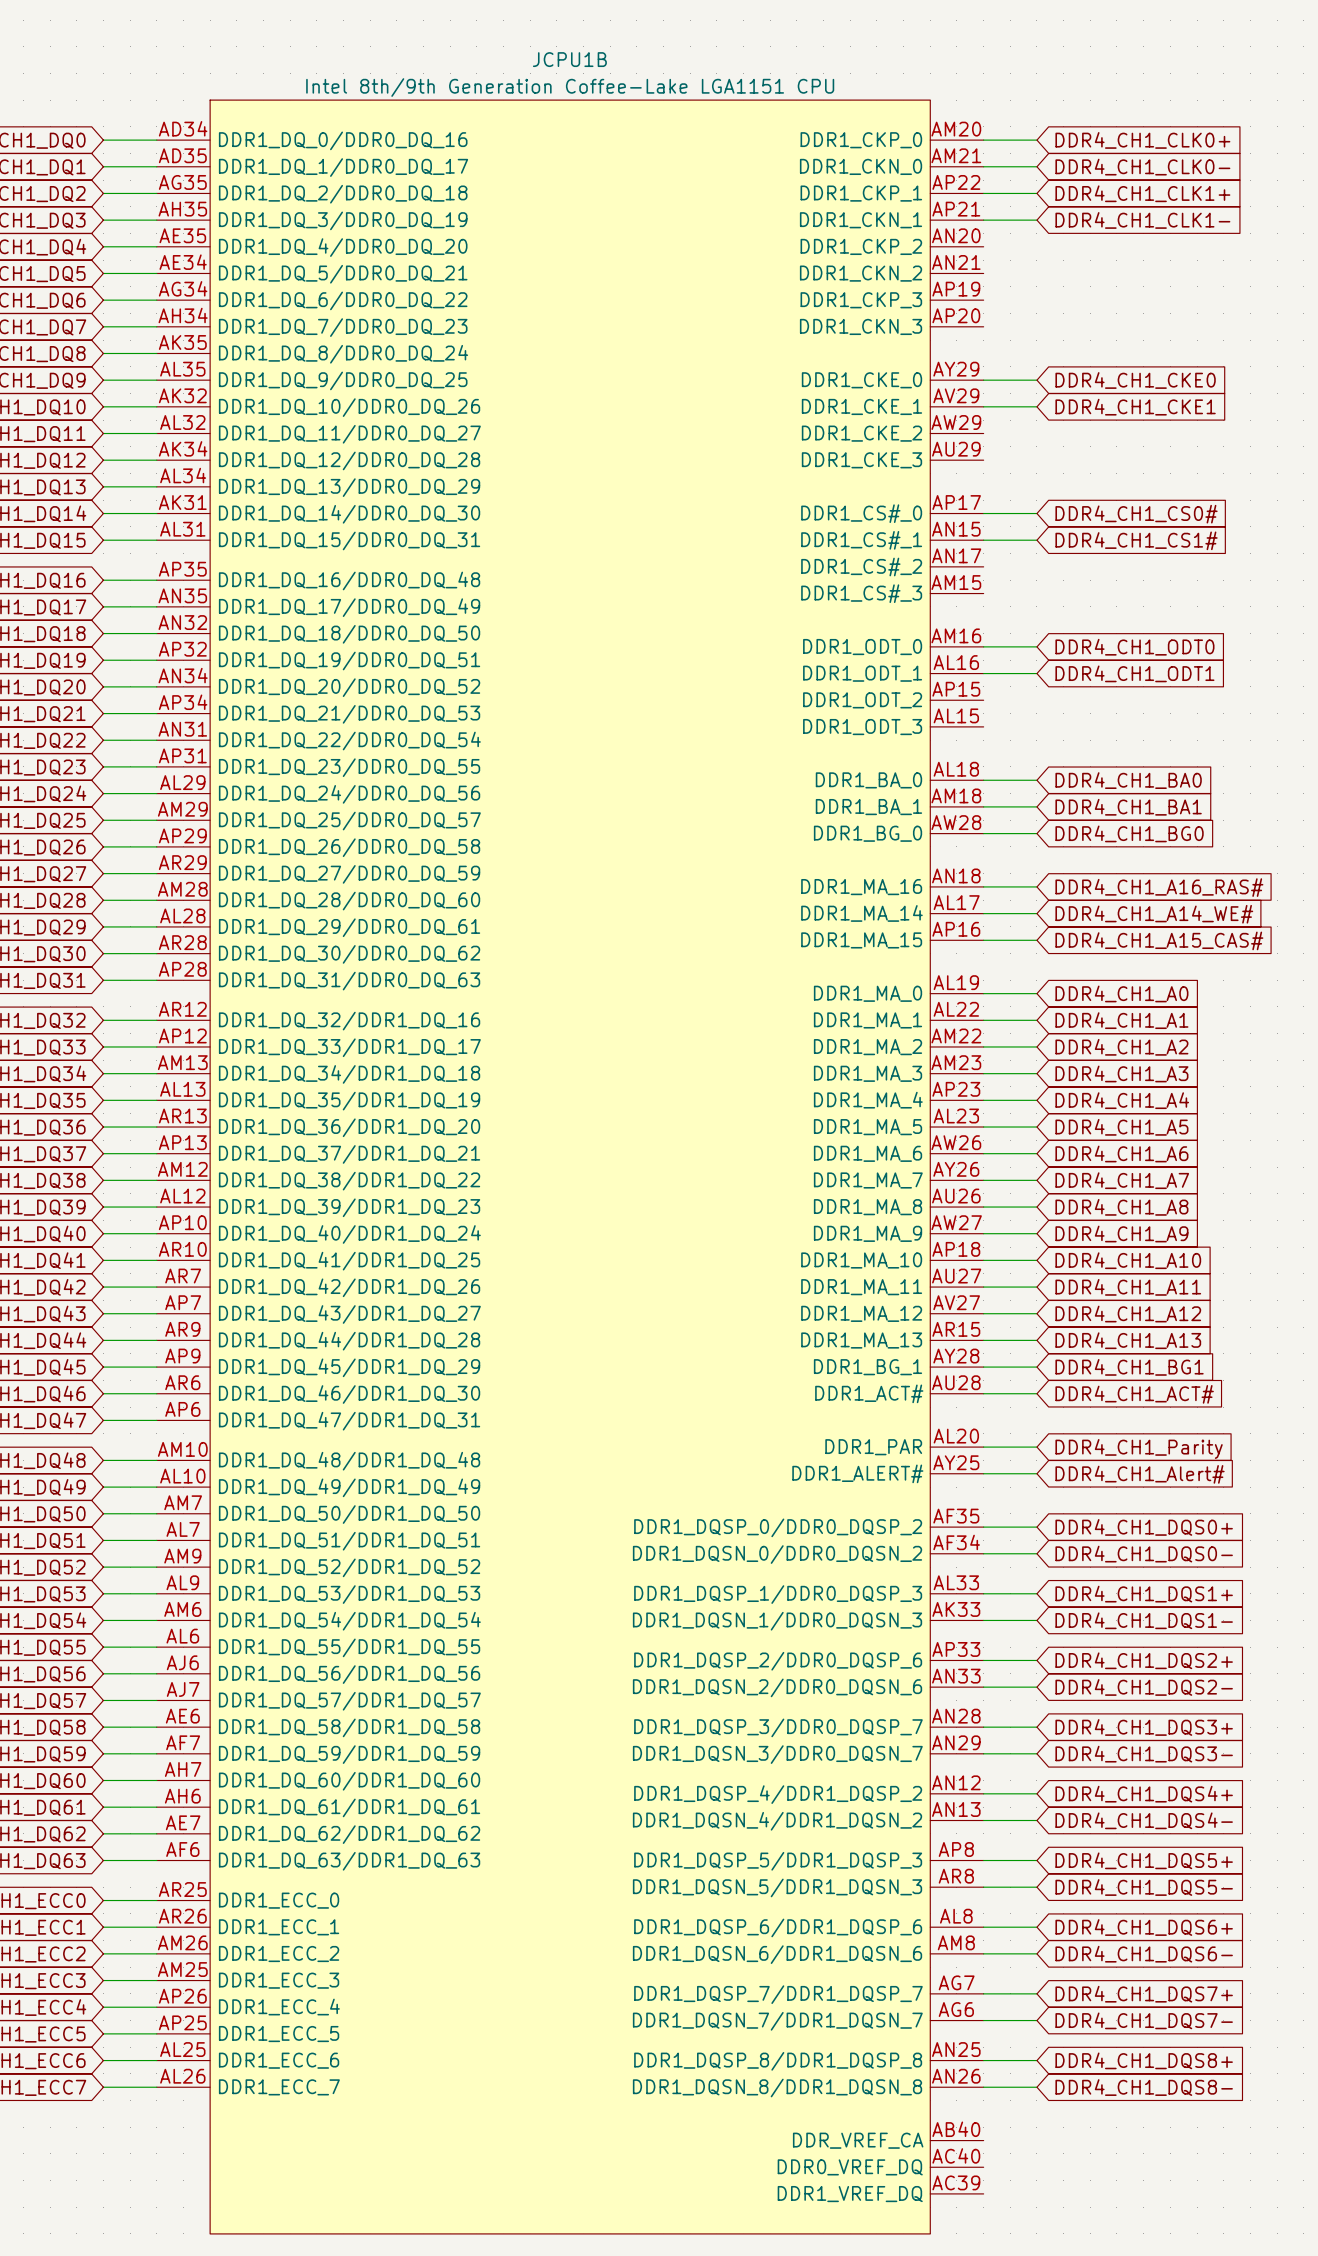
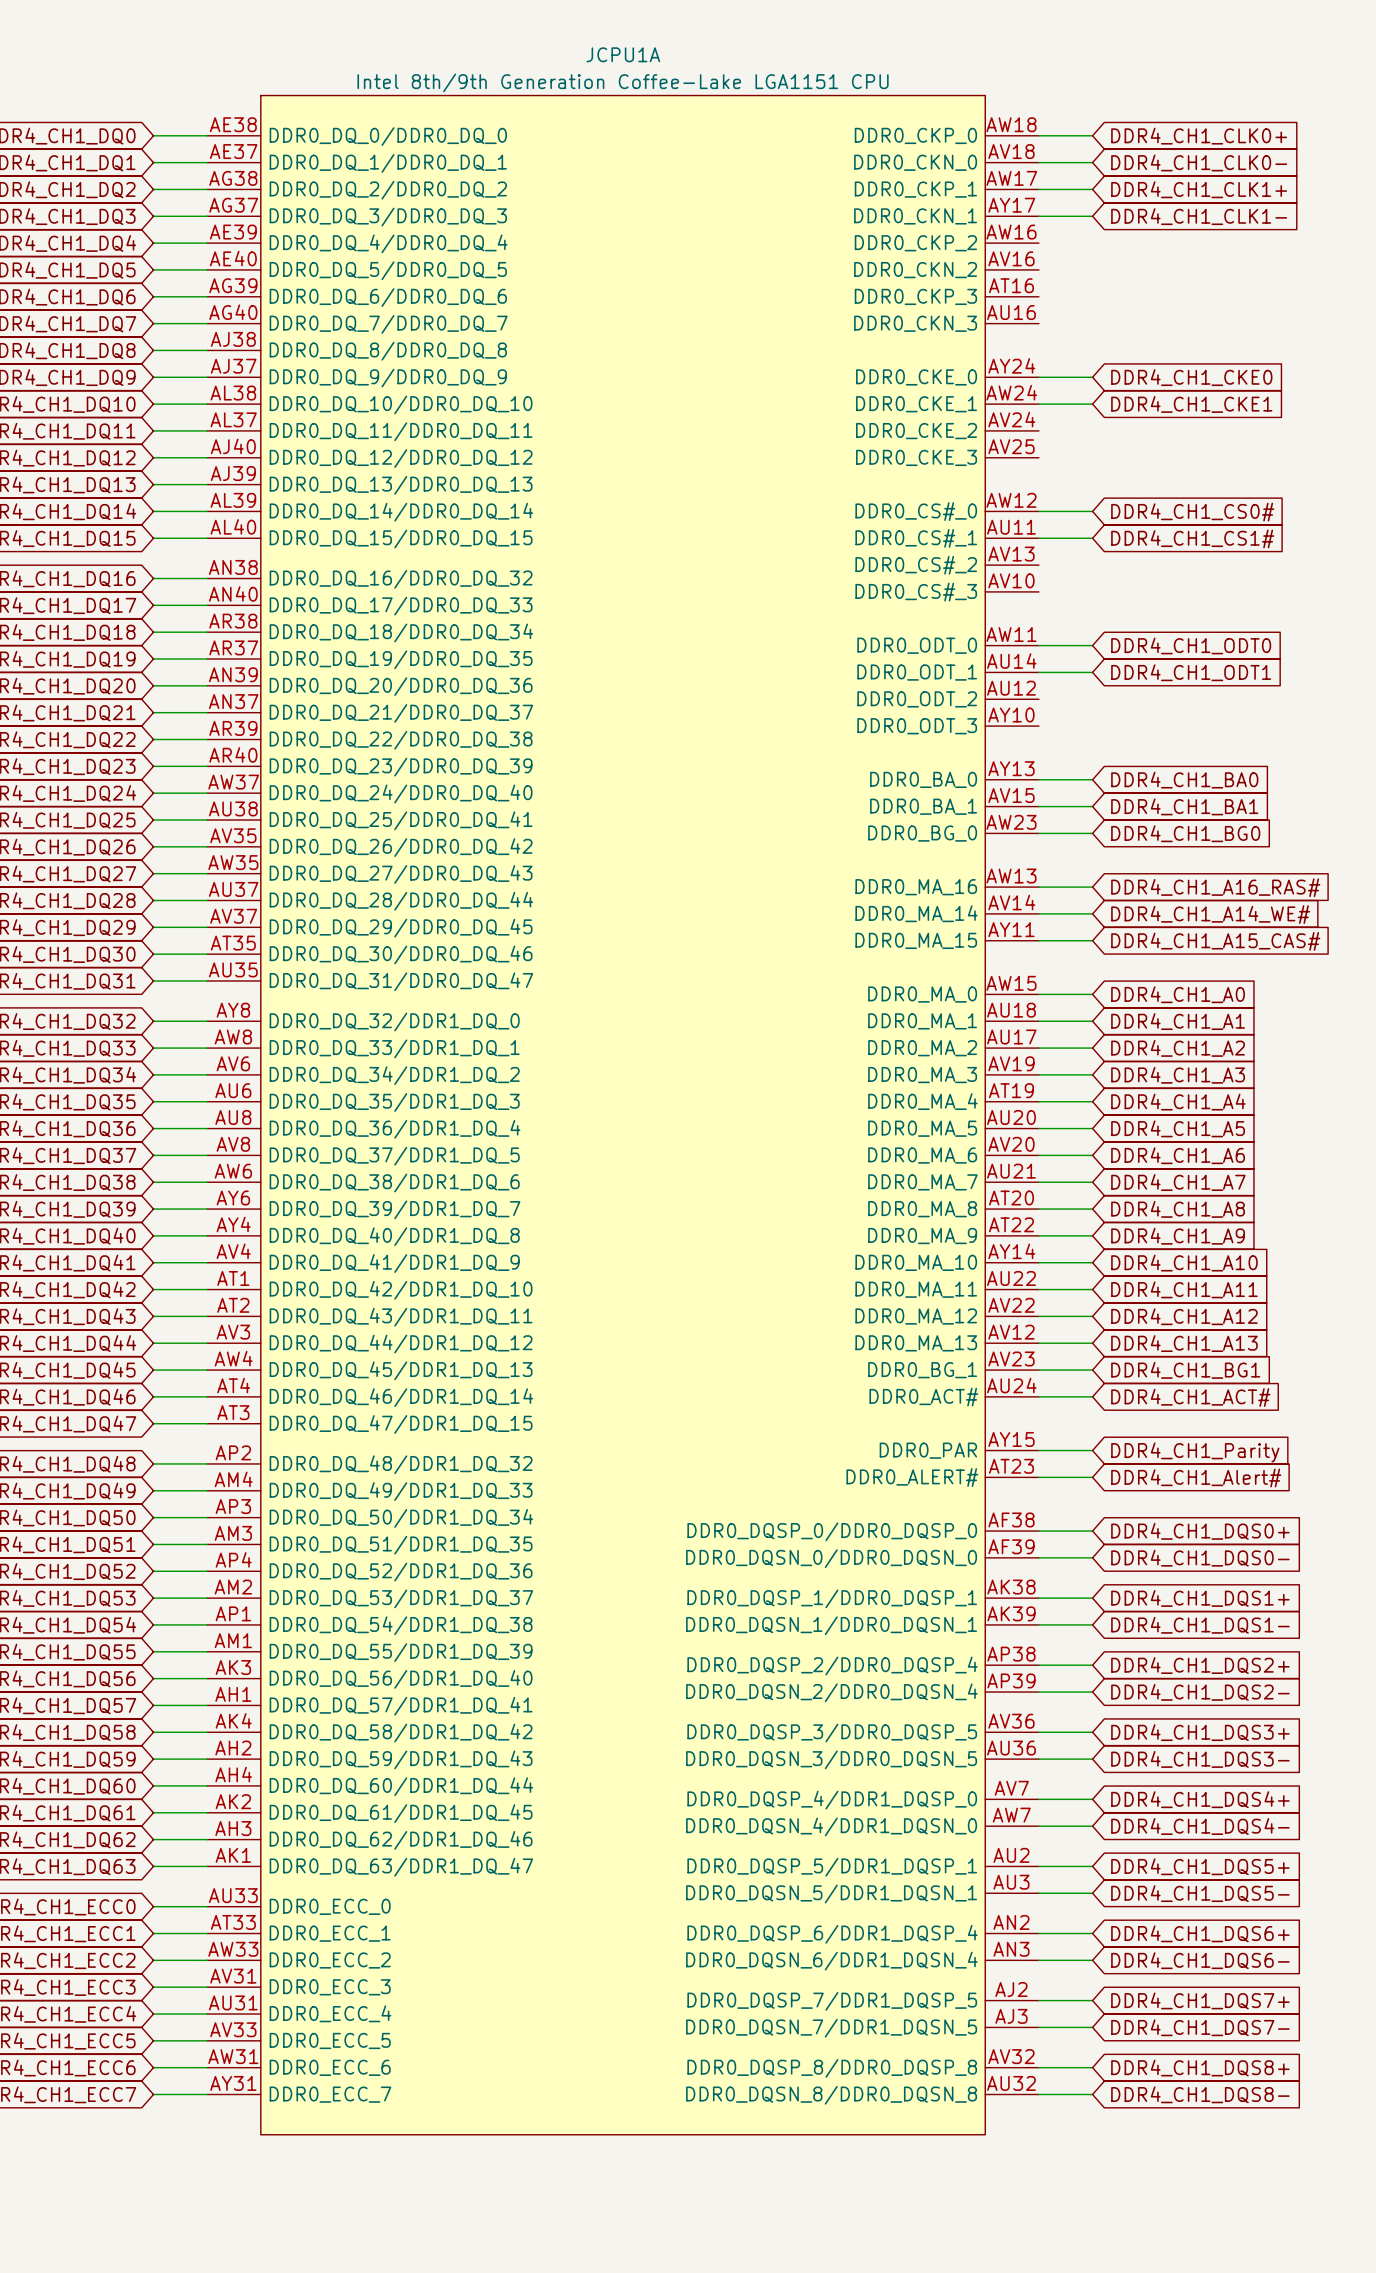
JCPU1A: none -> Intel 8th/9th Generation Coffee-Lake LGA1151 CPU (623, 1115)
JCPU1B: Intel 8th/9th Generation Coffee-Lake LGA1151 CPU (570, 1167) -> none

